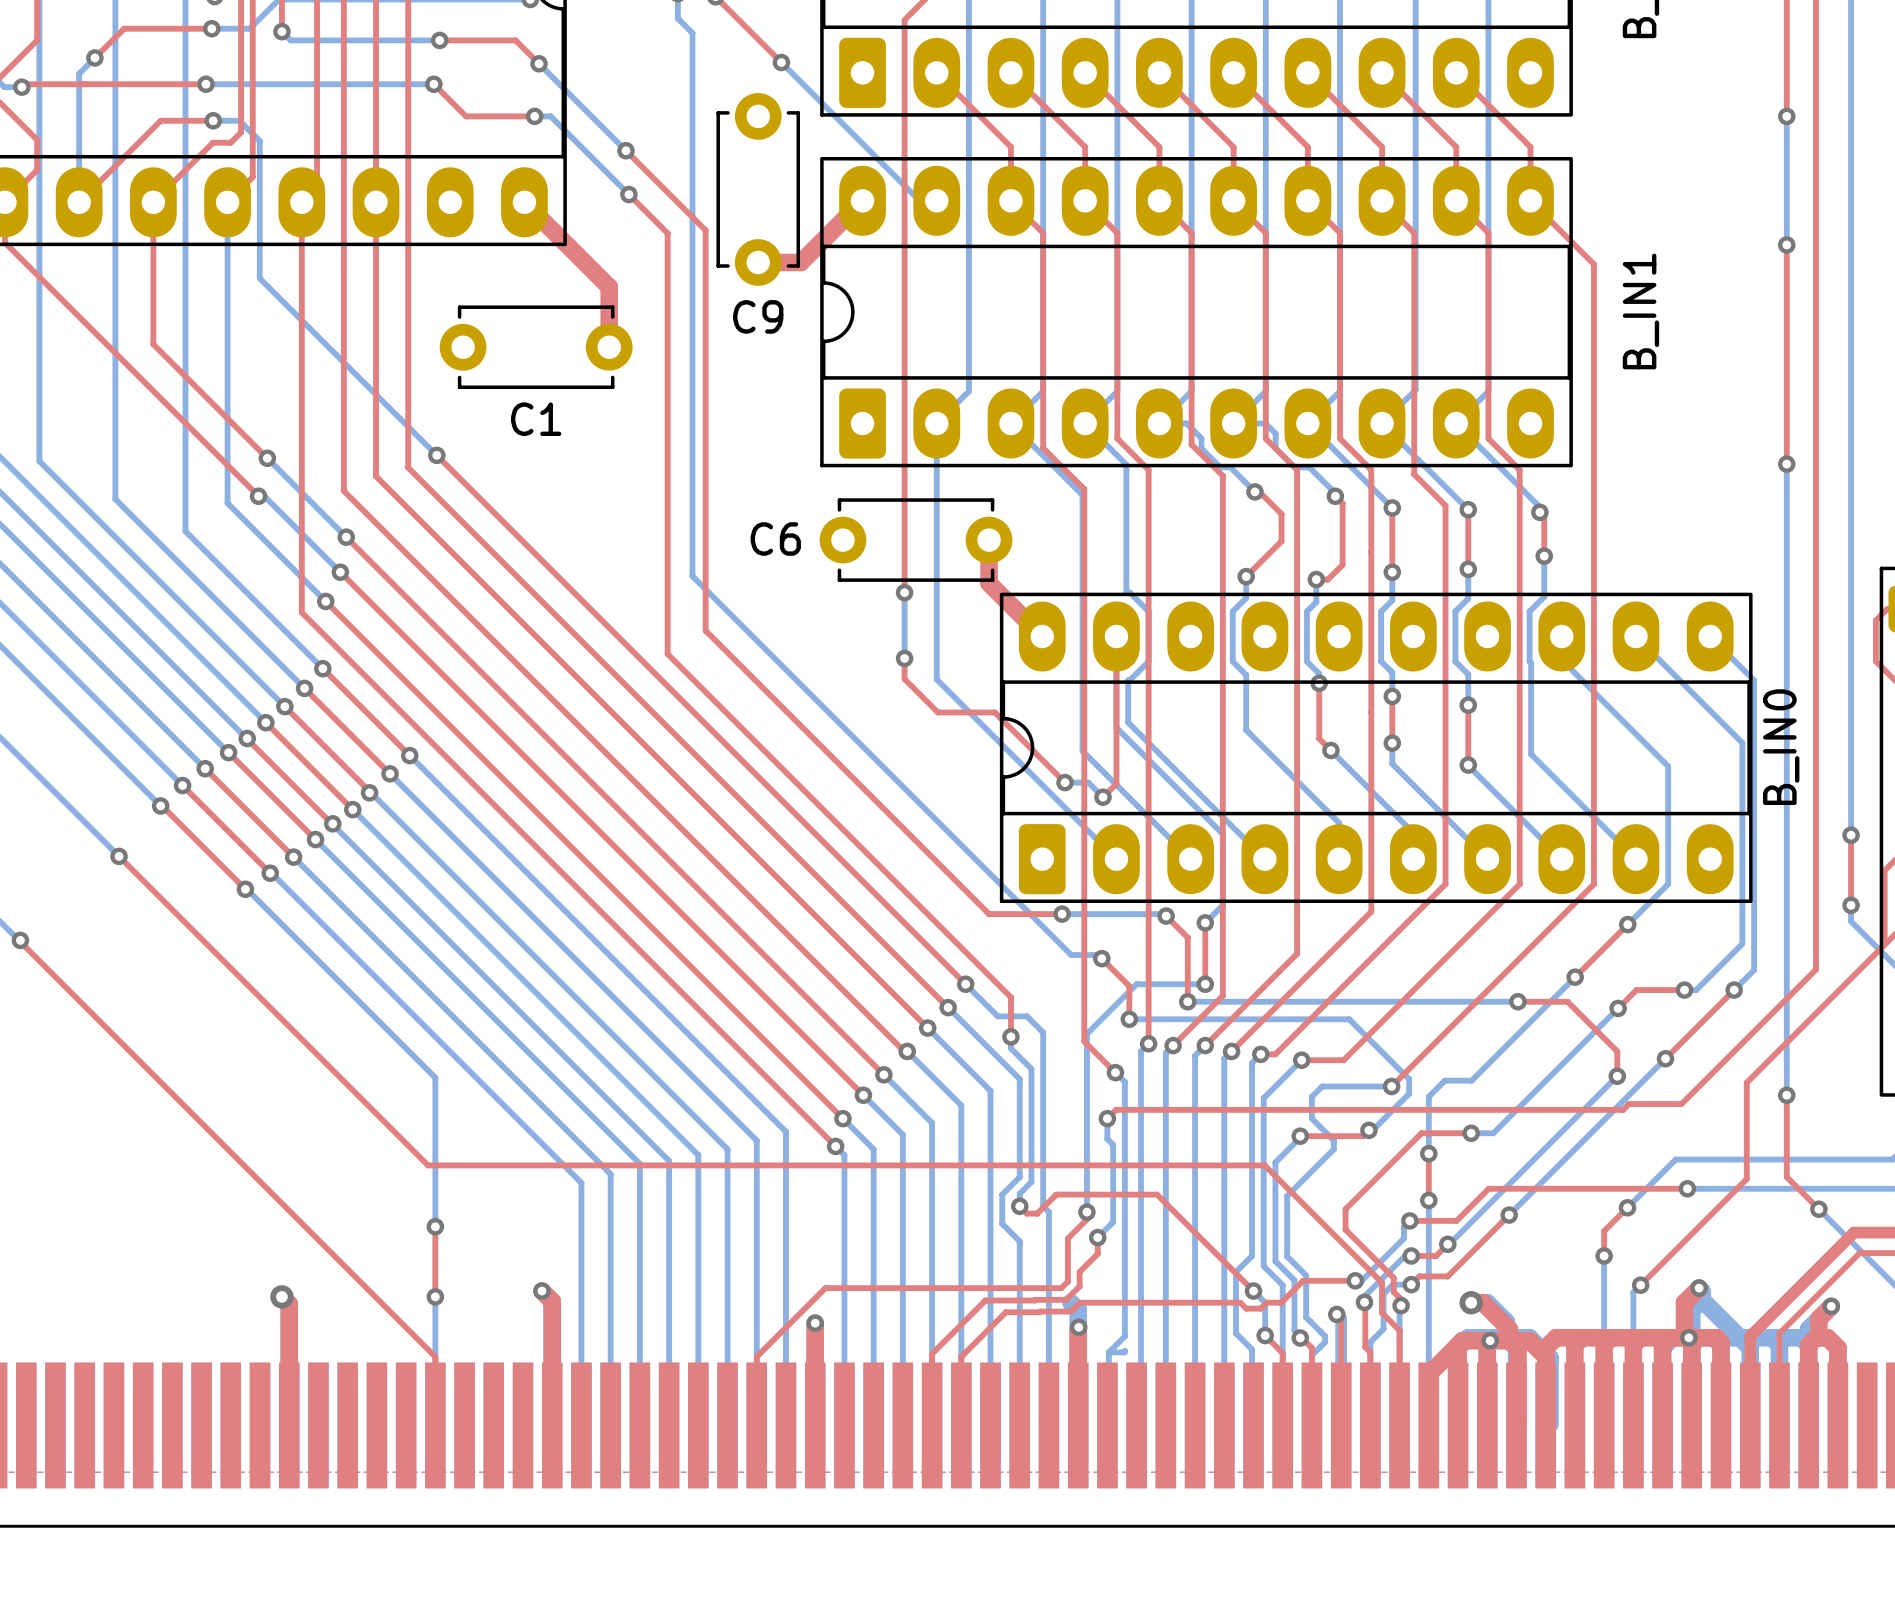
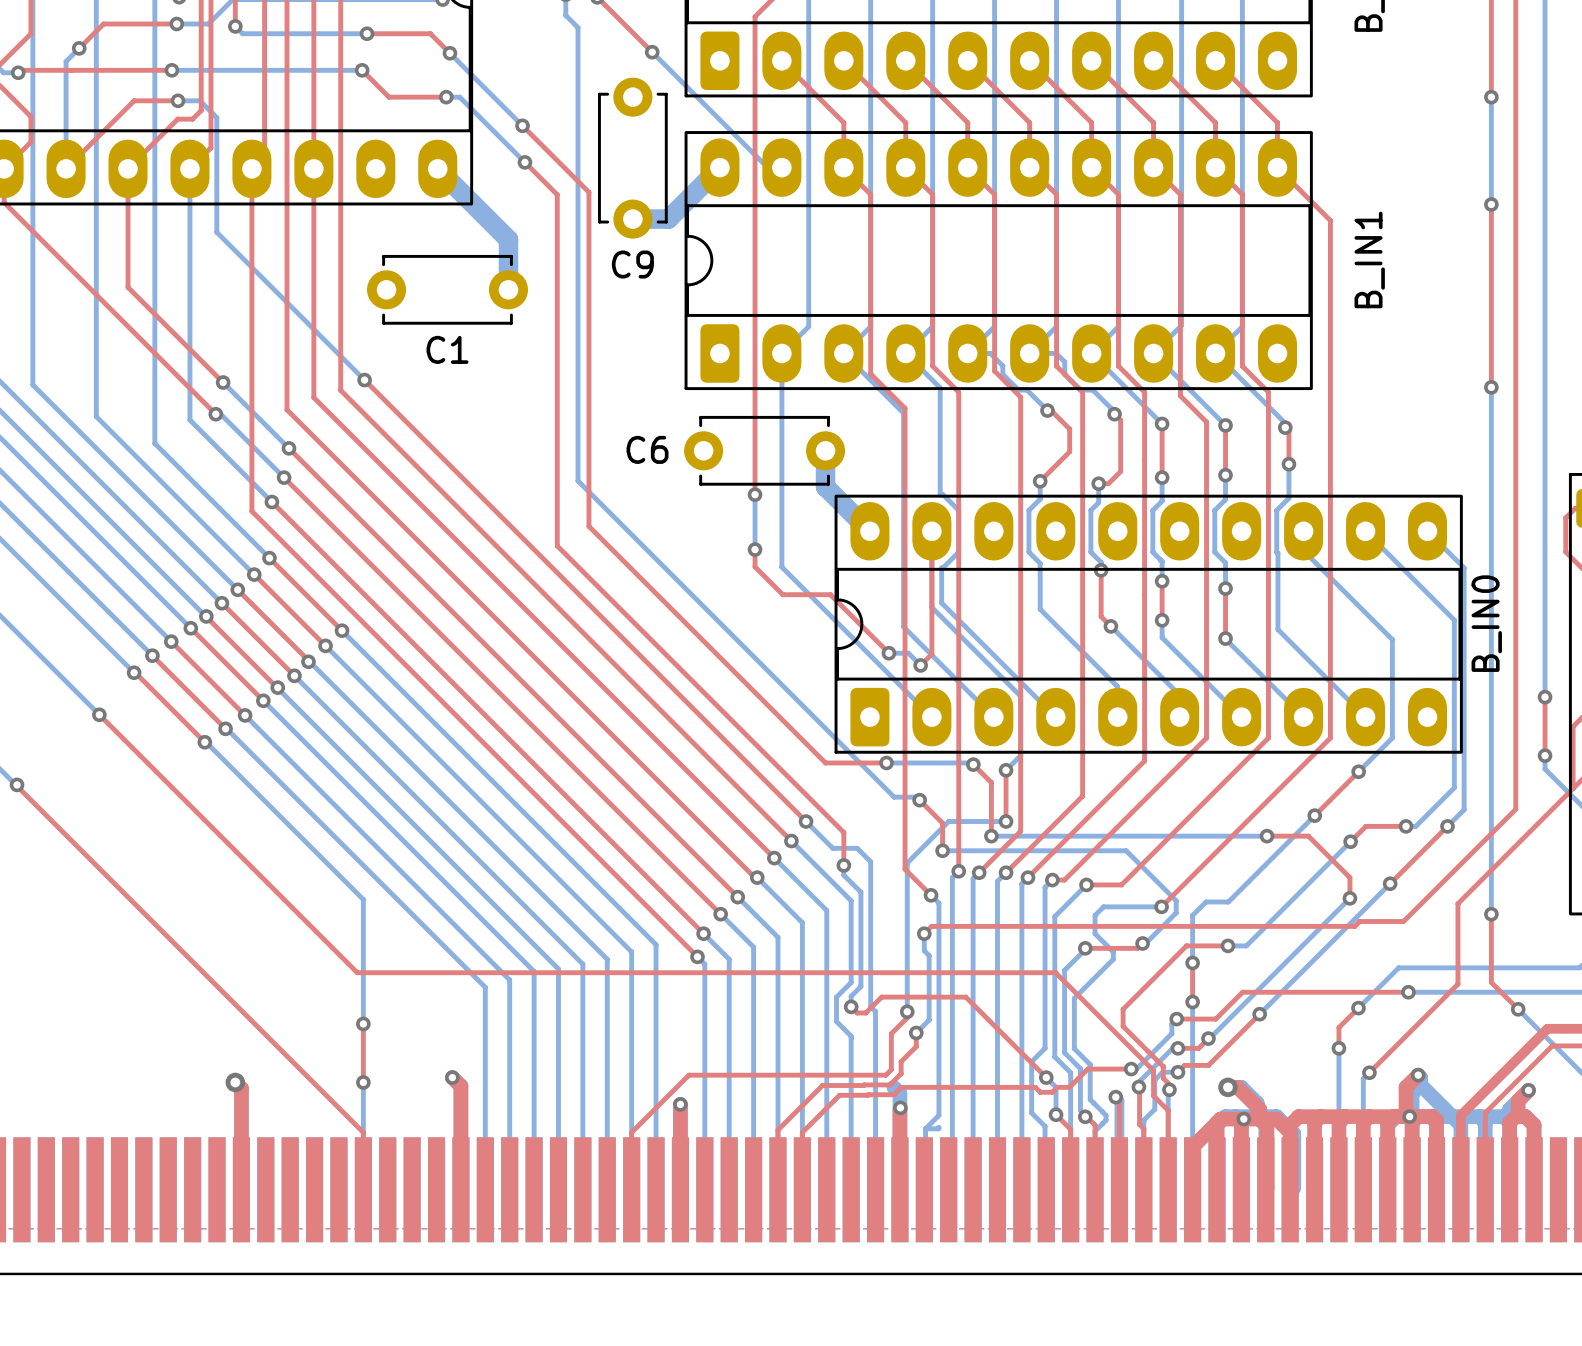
top track: (862, 200) (800, 262) (758, 262) -> none
bottom track: none -> (719, 167) (668, 219) (632, 219)
top track: (524, 202) (609, 287) (609, 347) -> none
bottom track: none -> (437, 168) (508, 239) (508, 289)
top track: (989, 540) (989, 583) (1042, 636) -> none
bottom track: none -> (825, 450) (825, 486) (869, 531)

